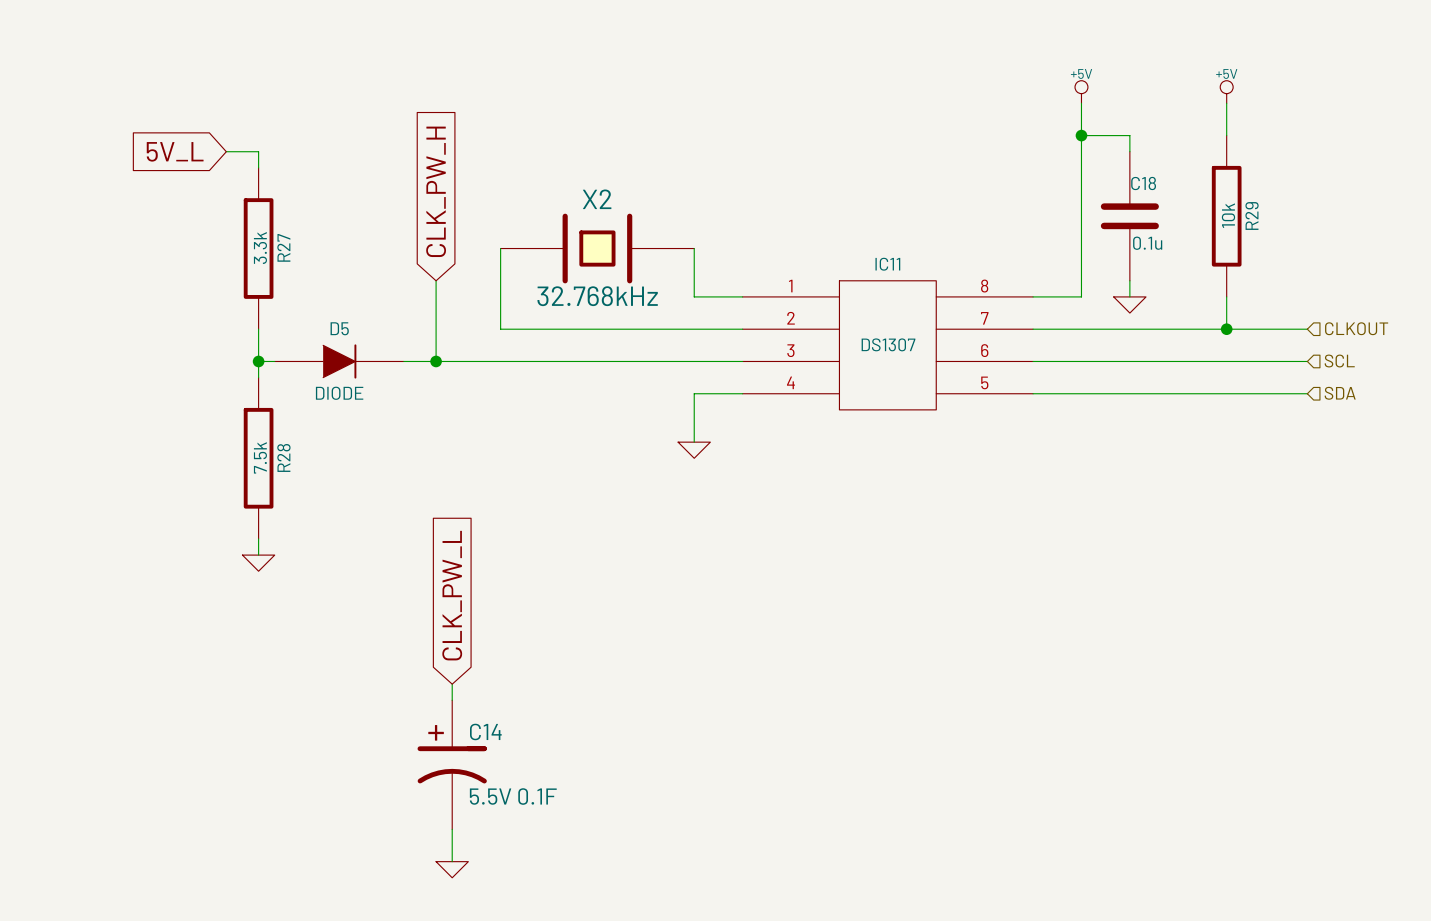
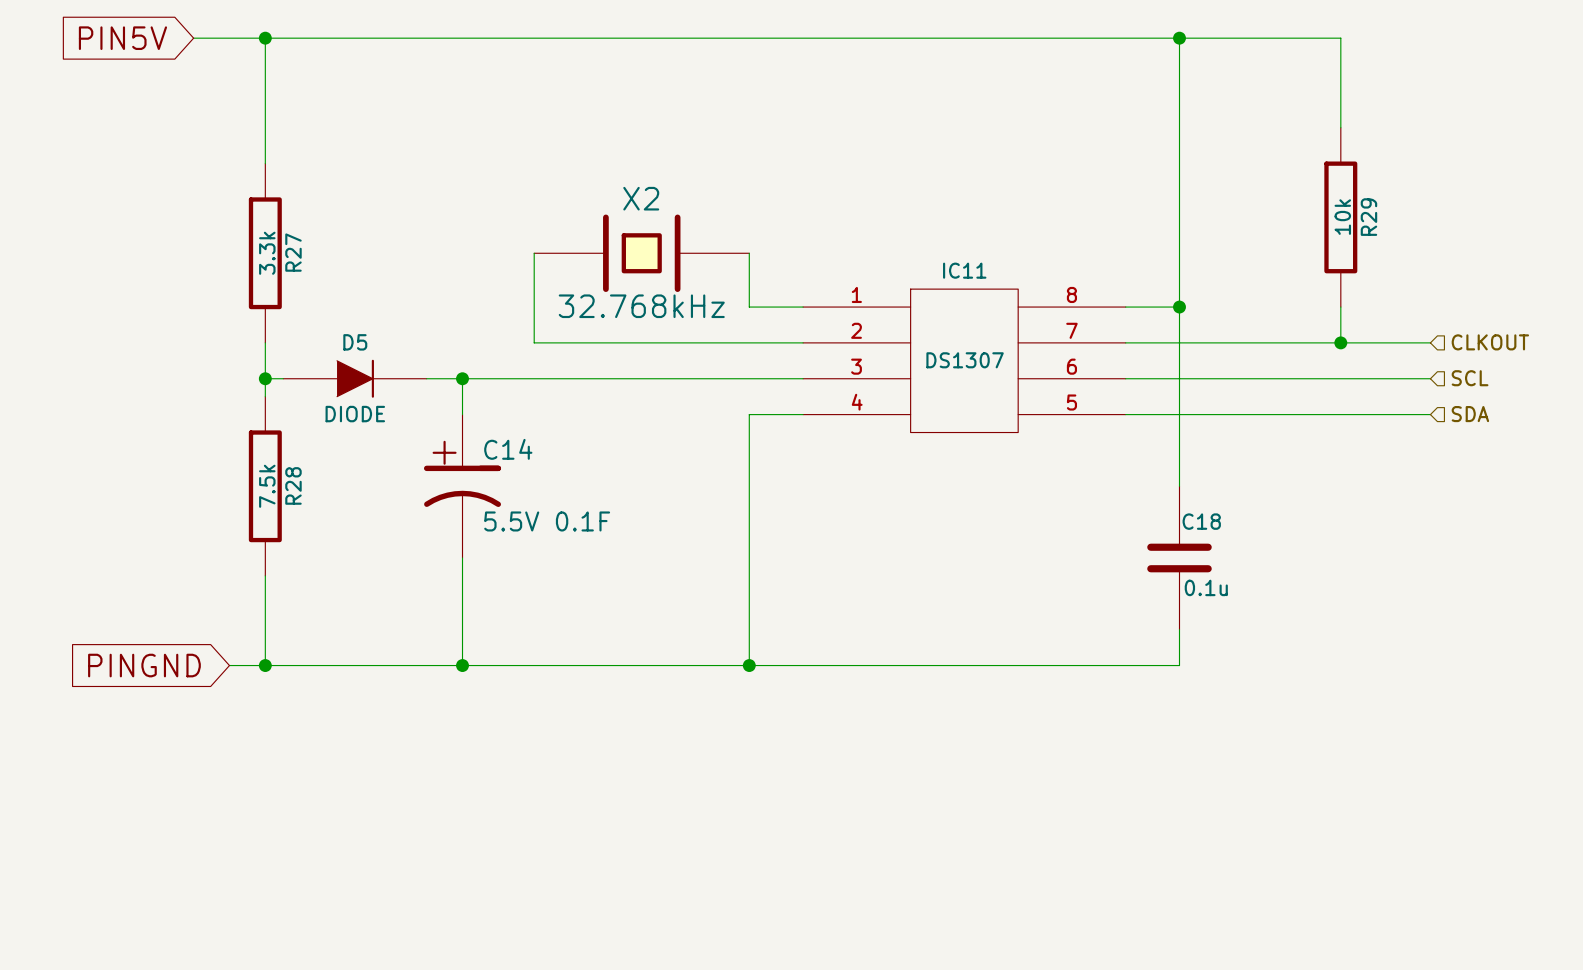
wire: none -> (193, 38) (1340, 38) (1340, 91)
junction: none -> (265, 38)
wire: none -> (1179, 38) (1179, 91)
junction: none -> (1179, 38)
global label: none -> PIN5V (122, 38)
power symbol: +5V (1081, 92) -> none
power symbol: +5V (1226, 92) -> none
wire: (1081, 135) (1129, 135) (1129, 151) -> none
junction: (1081, 135) -> none
global label: 5V_L (175, 151) -> none
wire: (226, 151) (258, 151) -> (265, 38) (265, 145)
global label: CLK_PW_H (436, 191) -> none
C18 position: (1129, 216) -> (1179, 557)
wire: (436, 280) (436, 361) -> (462, 414) (462, 378)
wire: (1129, 280) (1129, 296) -> none
wire: none -> (1179, 307) (1179, 486)
junction: none -> (1179, 307)
power symbol: (1129, 305) -> none
wire: none -> (749, 468) (749, 665)
power symbol: (694, 450) -> none
wire: none -> (462, 557) (462, 665)
wire: none -> (265, 593) (265, 665)
power symbol: (258, 563) -> none
wire: none -> (1179, 629) (1179, 665) (229, 665)
global label: CLK_PW_L (452, 595) -> none
global label: none -> PINGND (144, 665)
junction: none -> (265, 665)
junction: none -> (462, 665)
junction: none -> (749, 665)
wire: (452, 684) (452, 700) -> none
C14 position: (452, 764) -> (462, 486)
wire: (452, 829) (452, 861) -> none
power symbol: (452, 869) -> none

